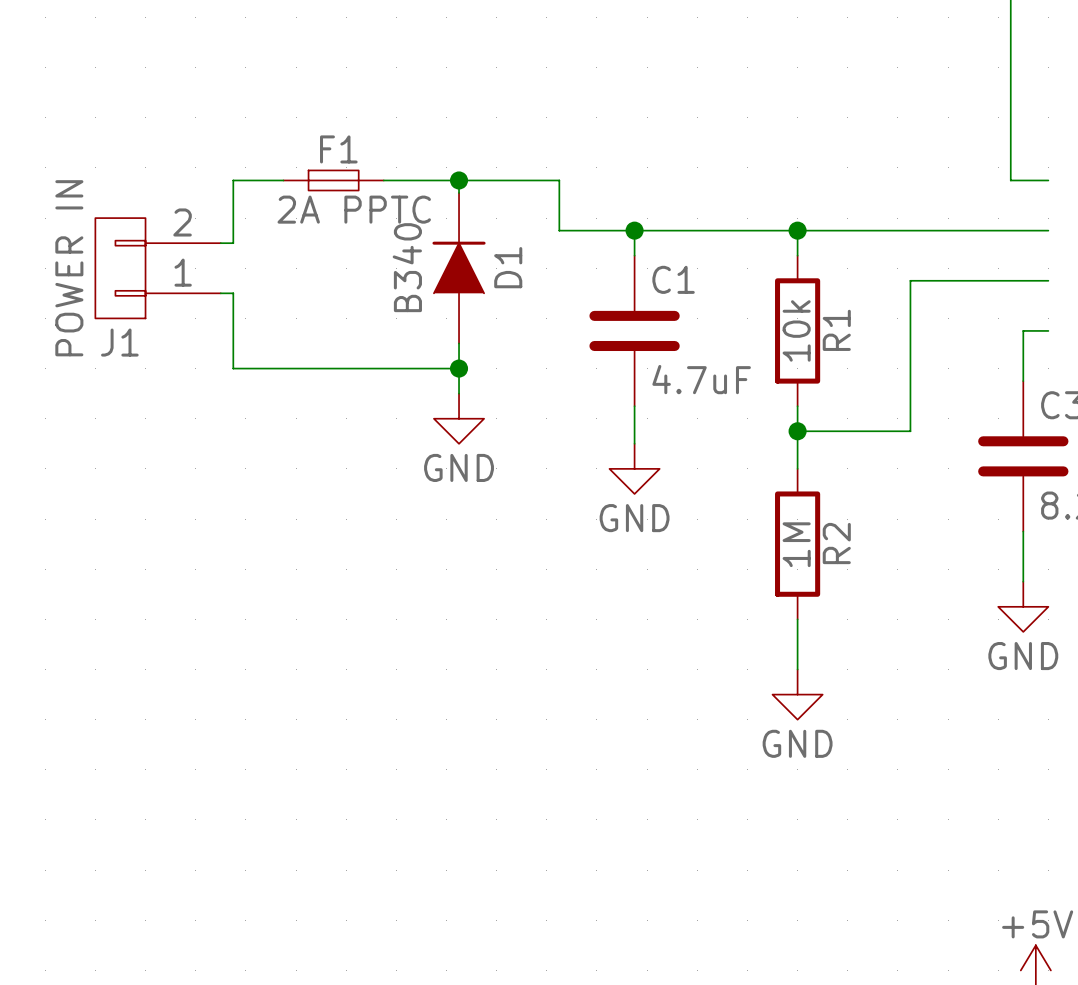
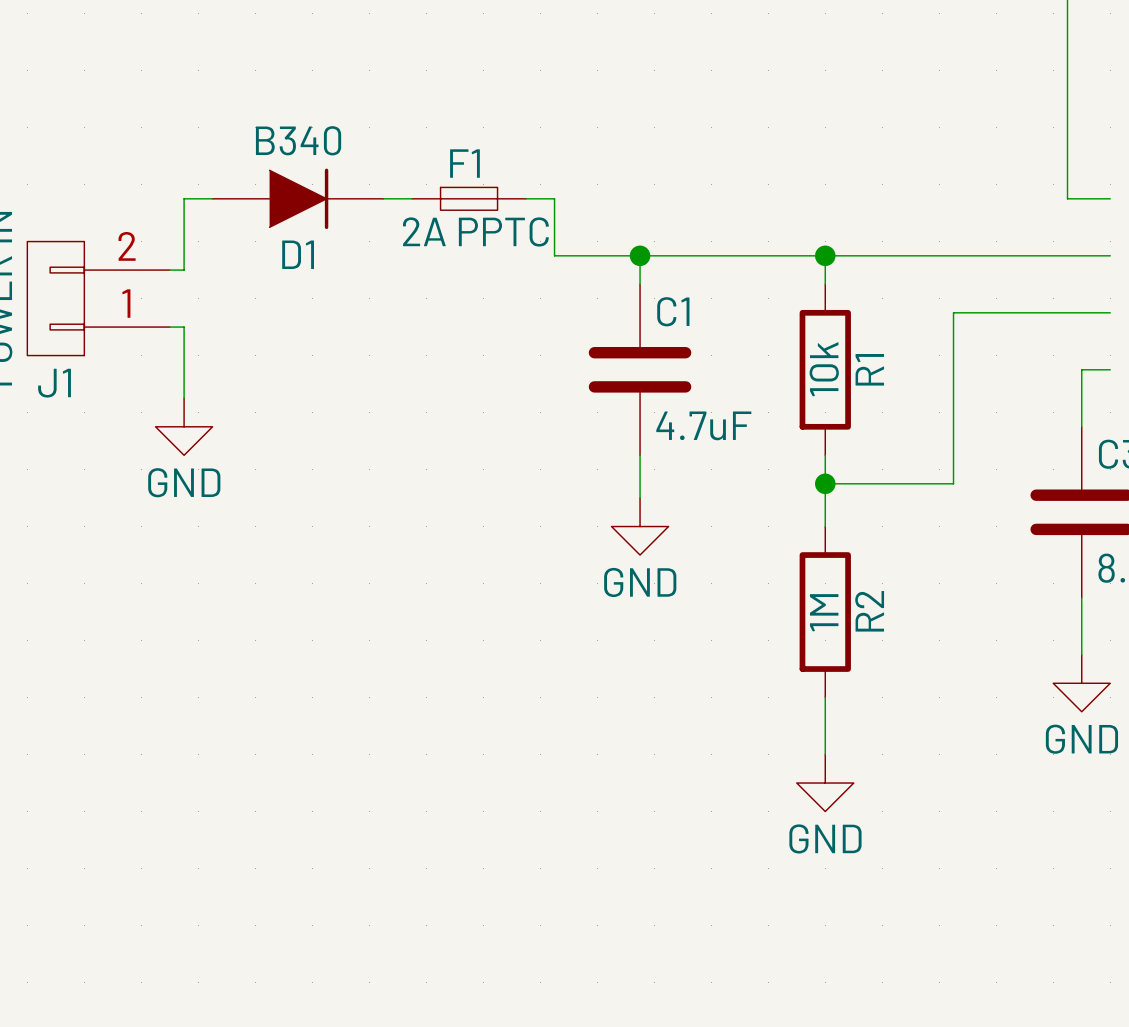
F1 position: (333, 180) -> (469, 198)
junction: (459, 180) -> none
D1 rotation: 0° (459, 267) -> 90° clockwise (298, 198)
D1 position: (459, 268) -> (298, 198)
wire: (459, 343) (459, 393) -> none
wire: (233, 356) (233, 368) (459, 368) -> none
junction: (459, 368) -> none
power symbol position: GND (459, 418) -> GND (184, 426)

